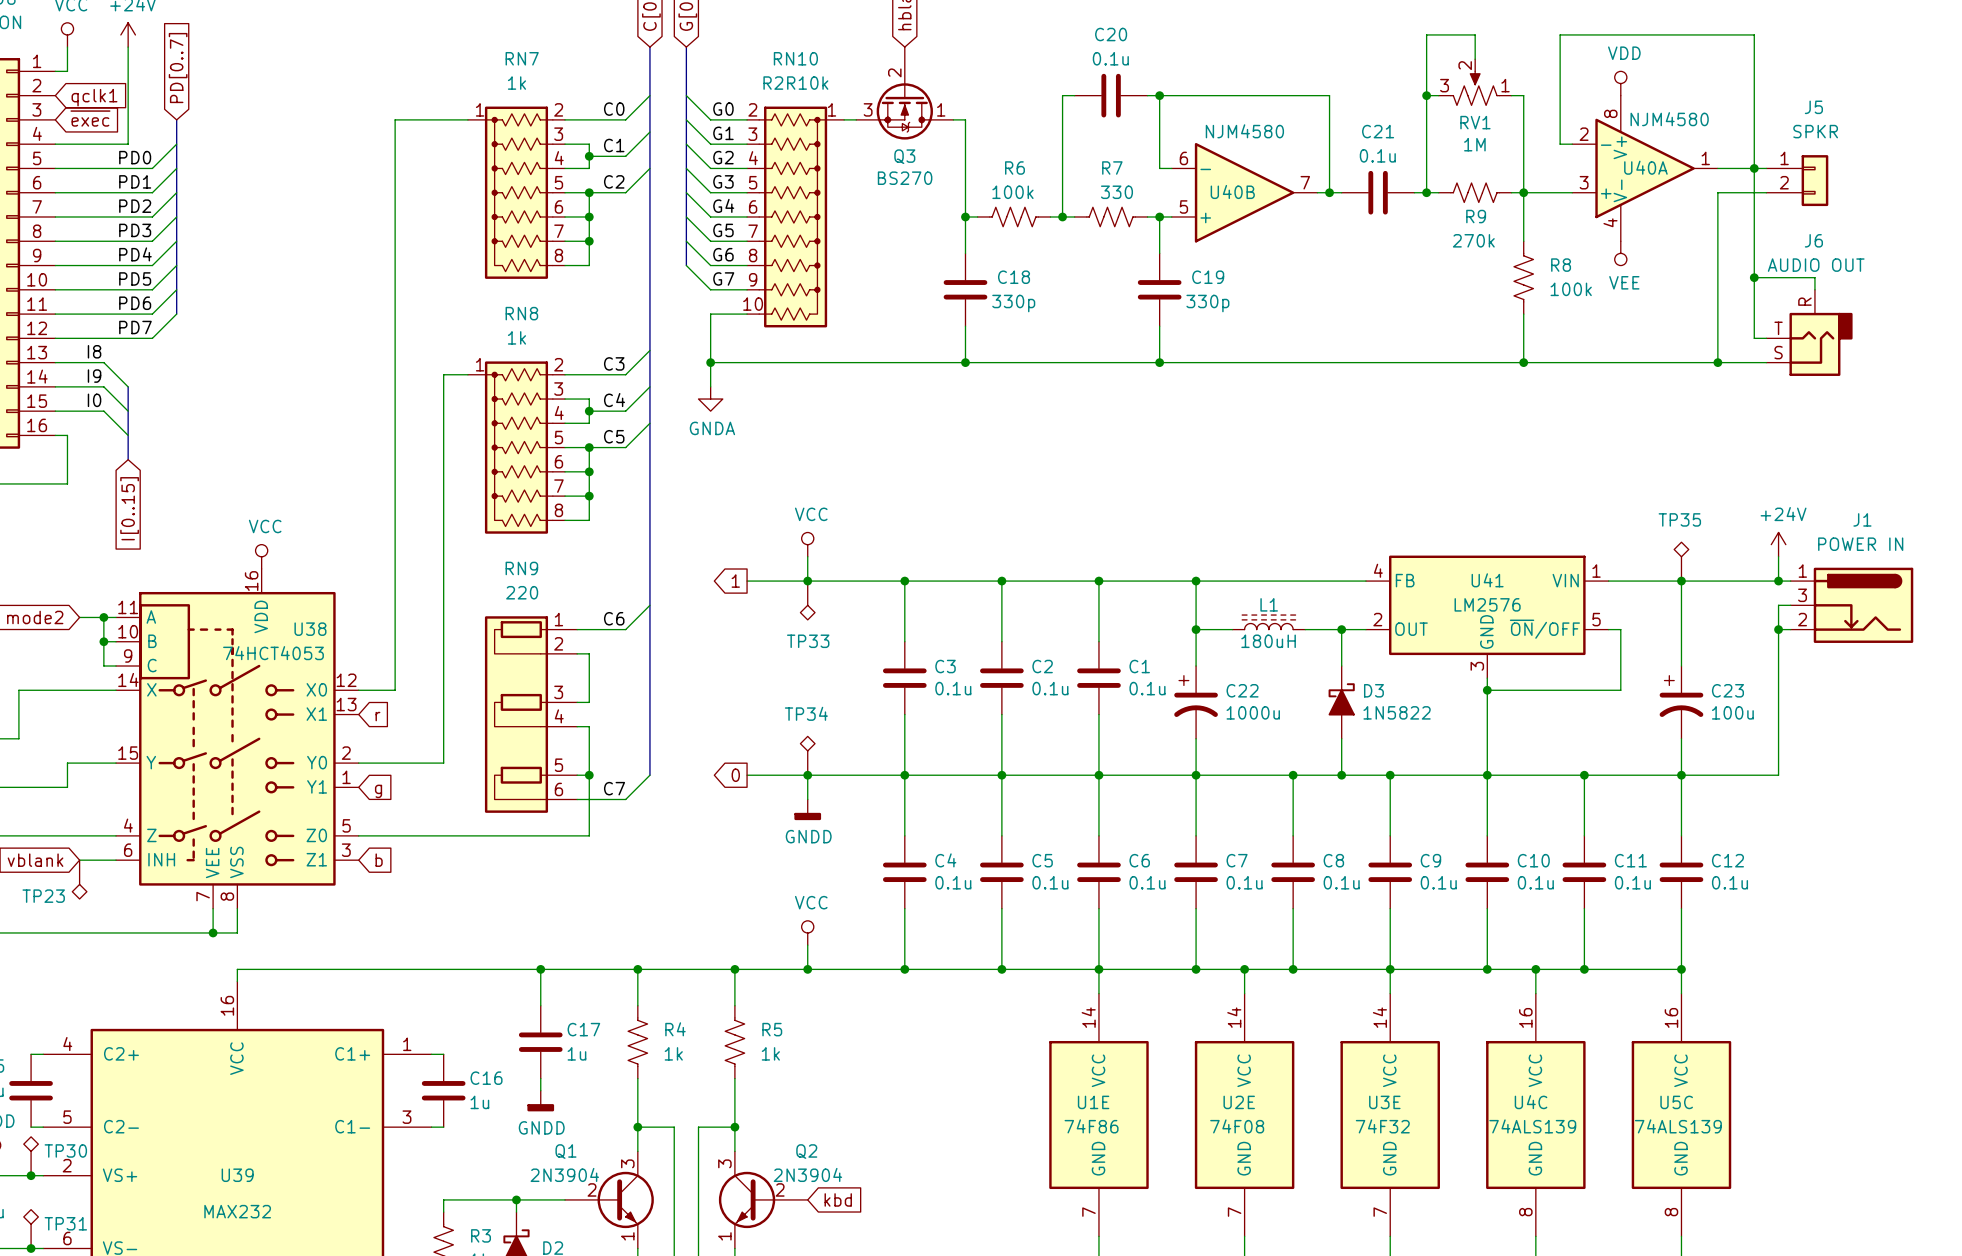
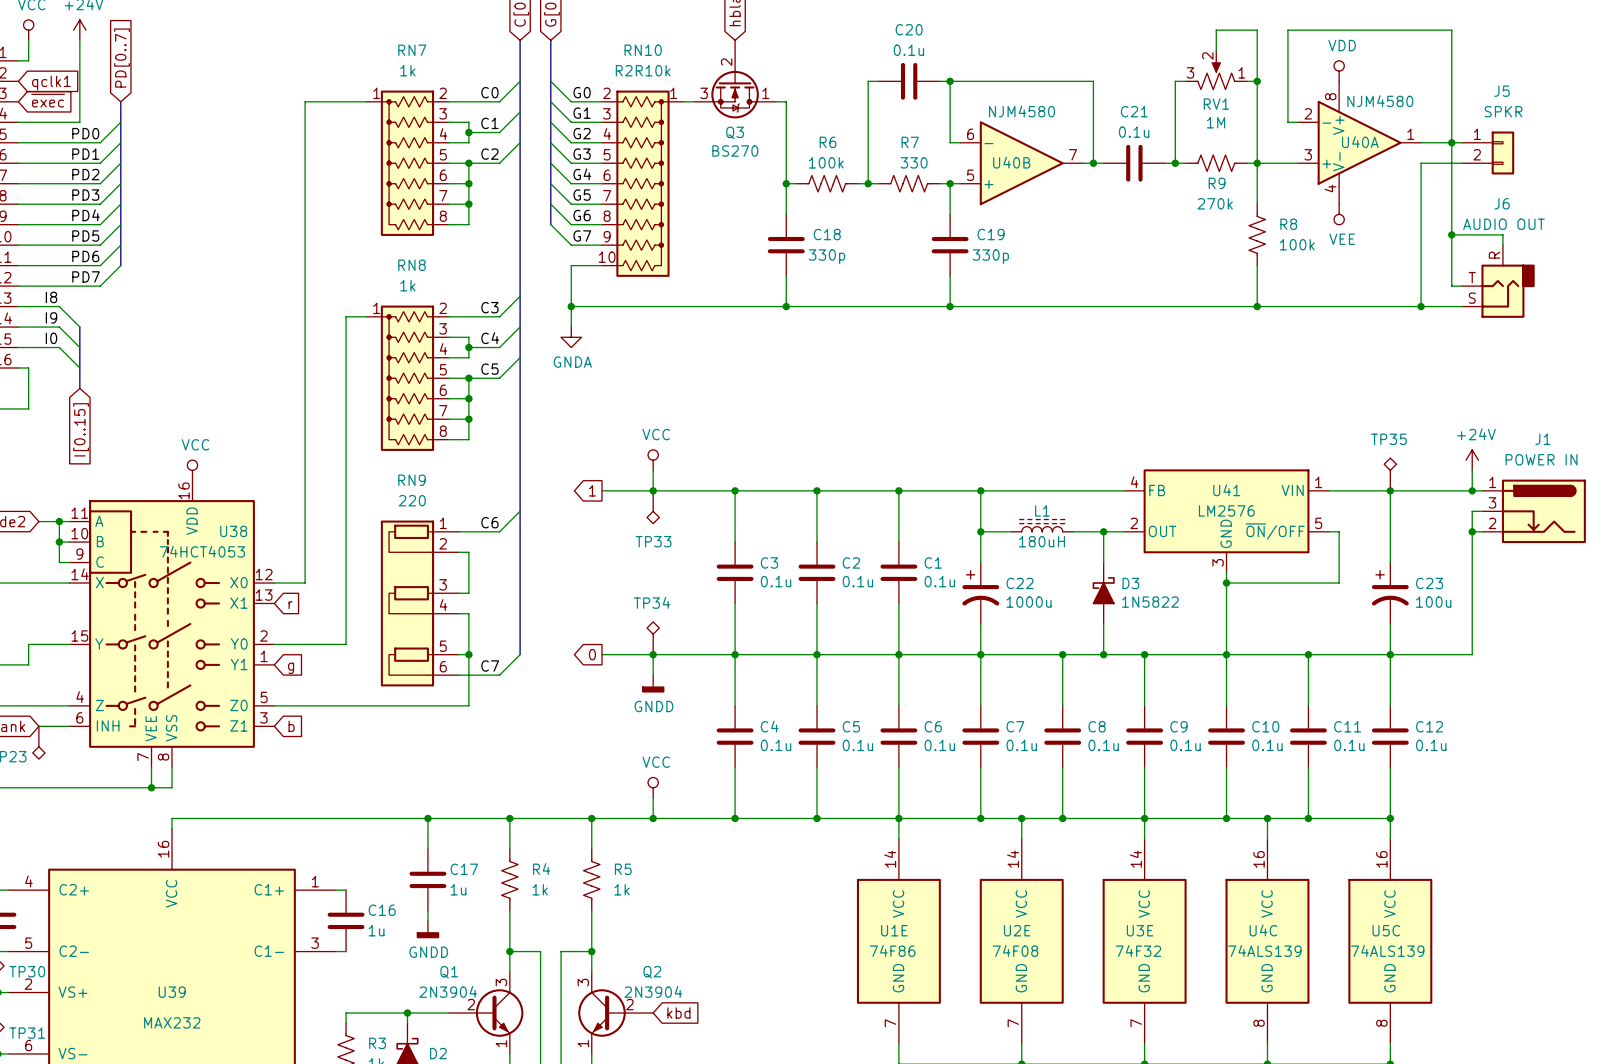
wire: (1475, 34) (1426, 34) (1426, 95) -> (1216, 30) (1257, 30) (1257, 81)
junction: (1426, 95) -> none
junction: none -> (1257, 81)

